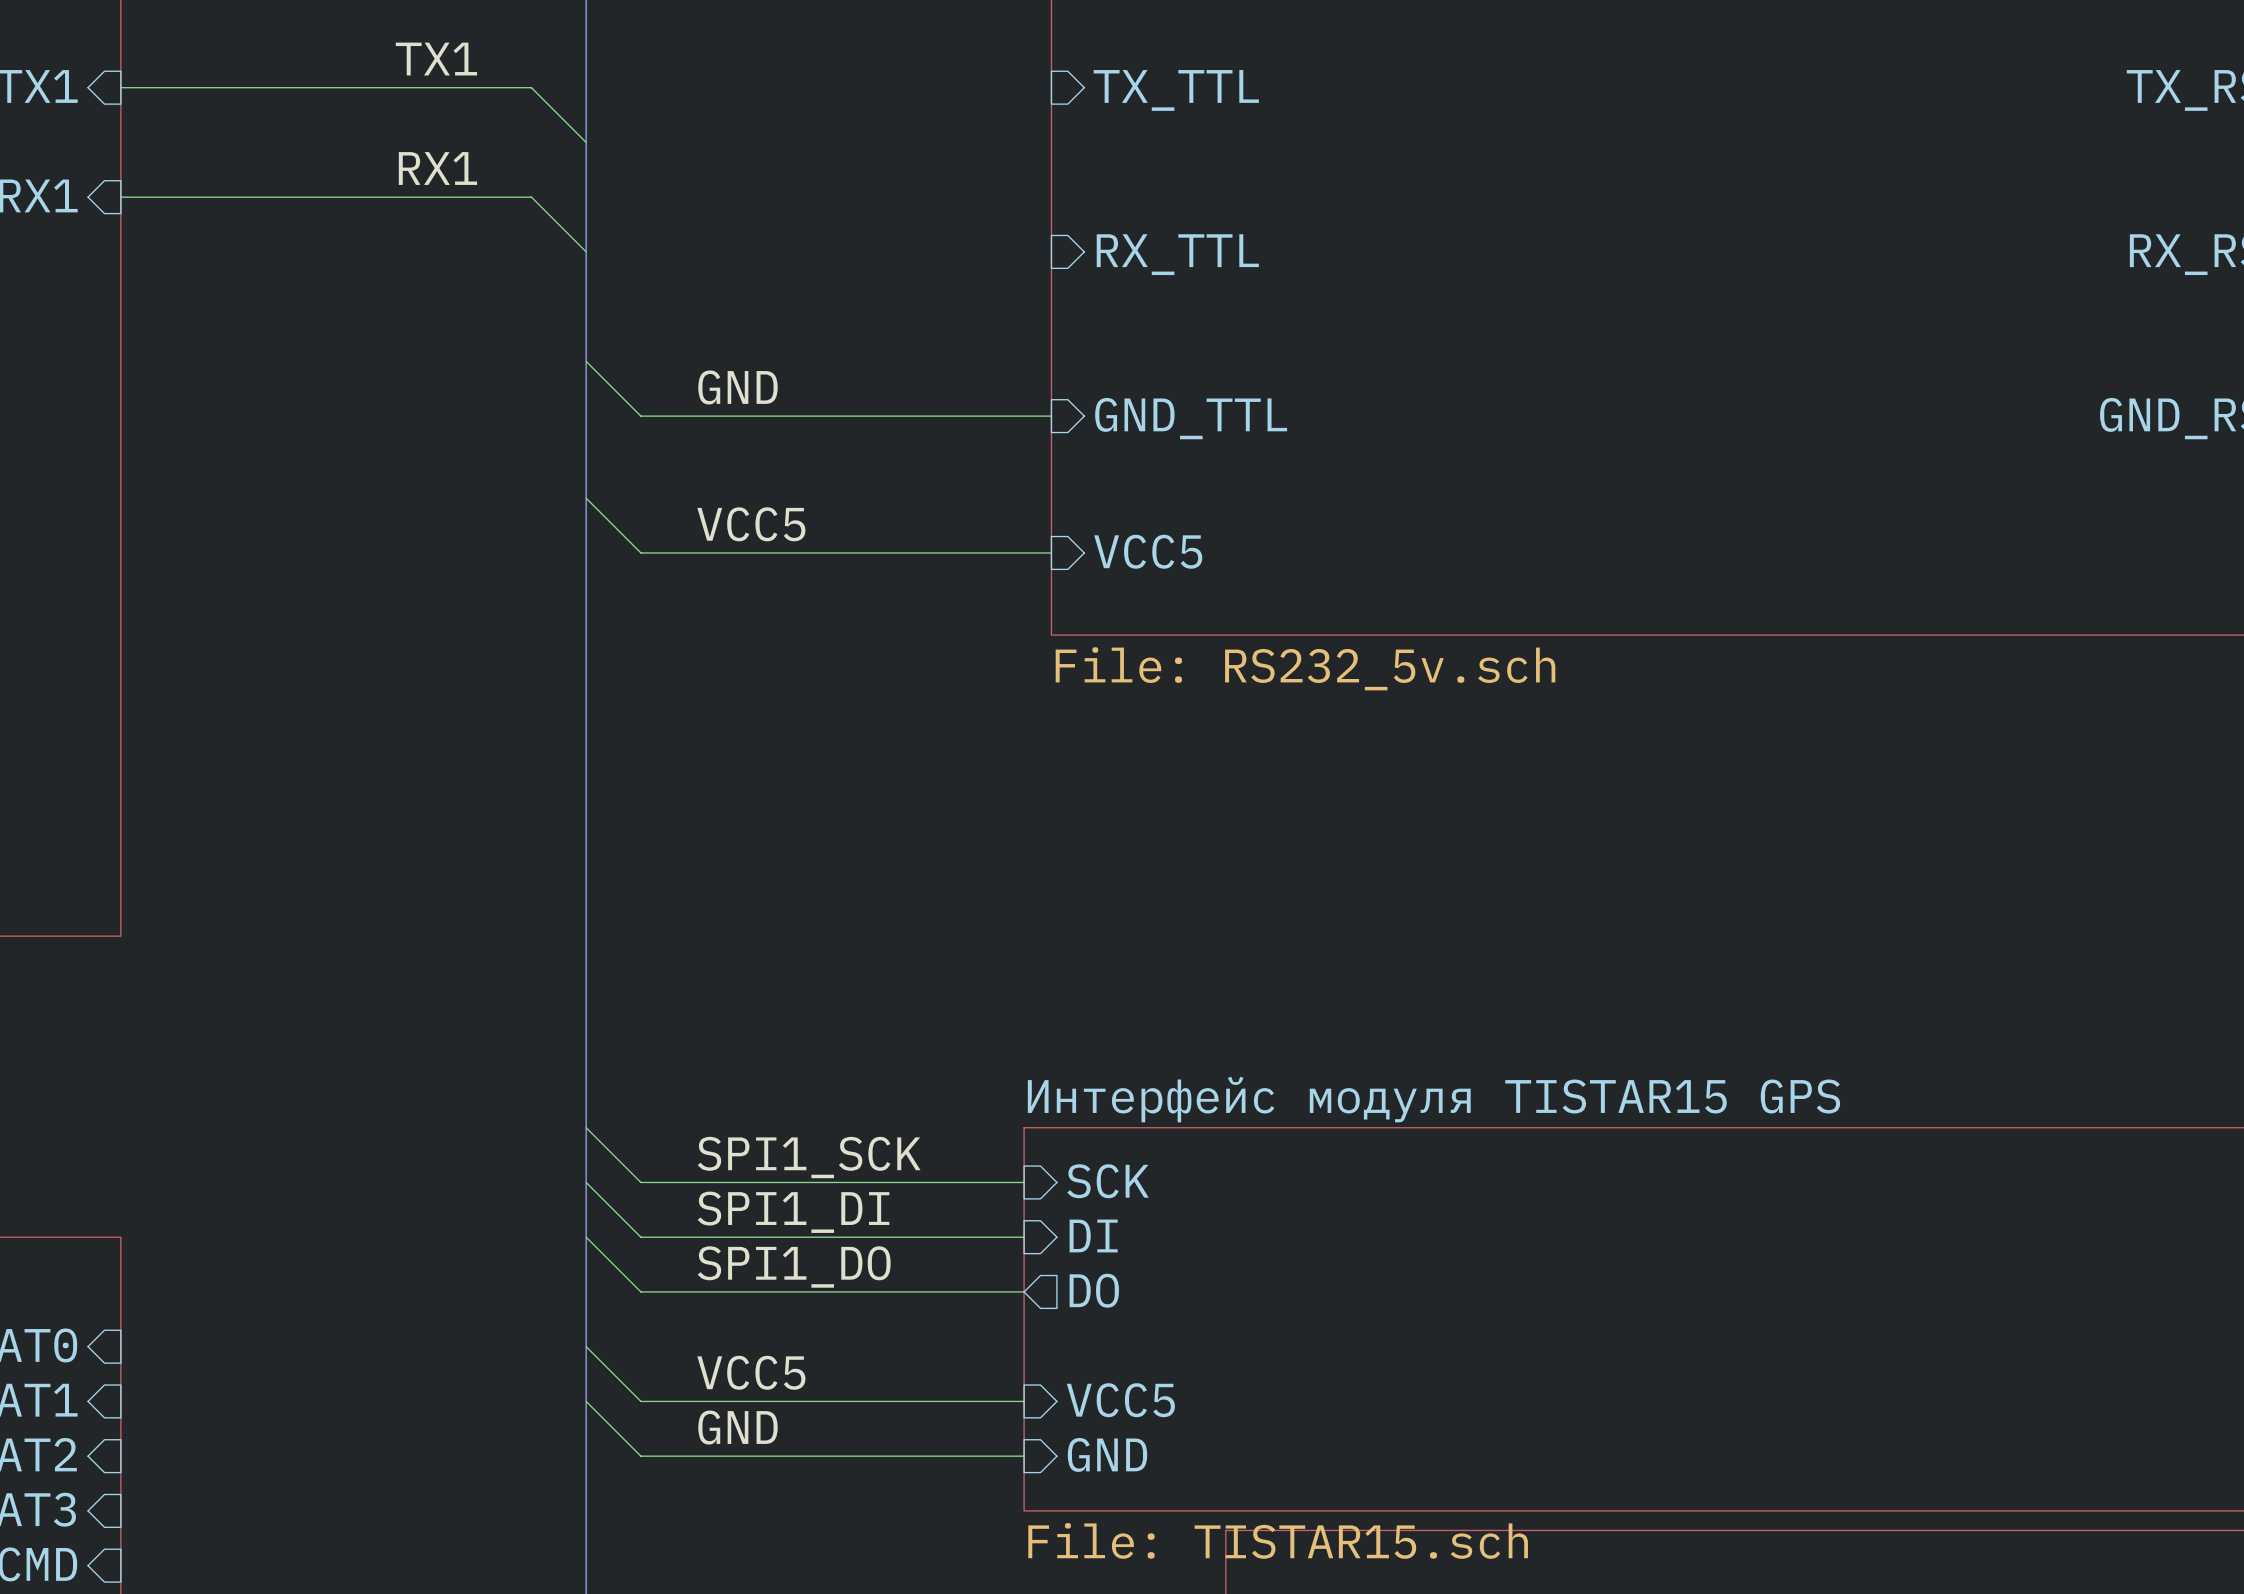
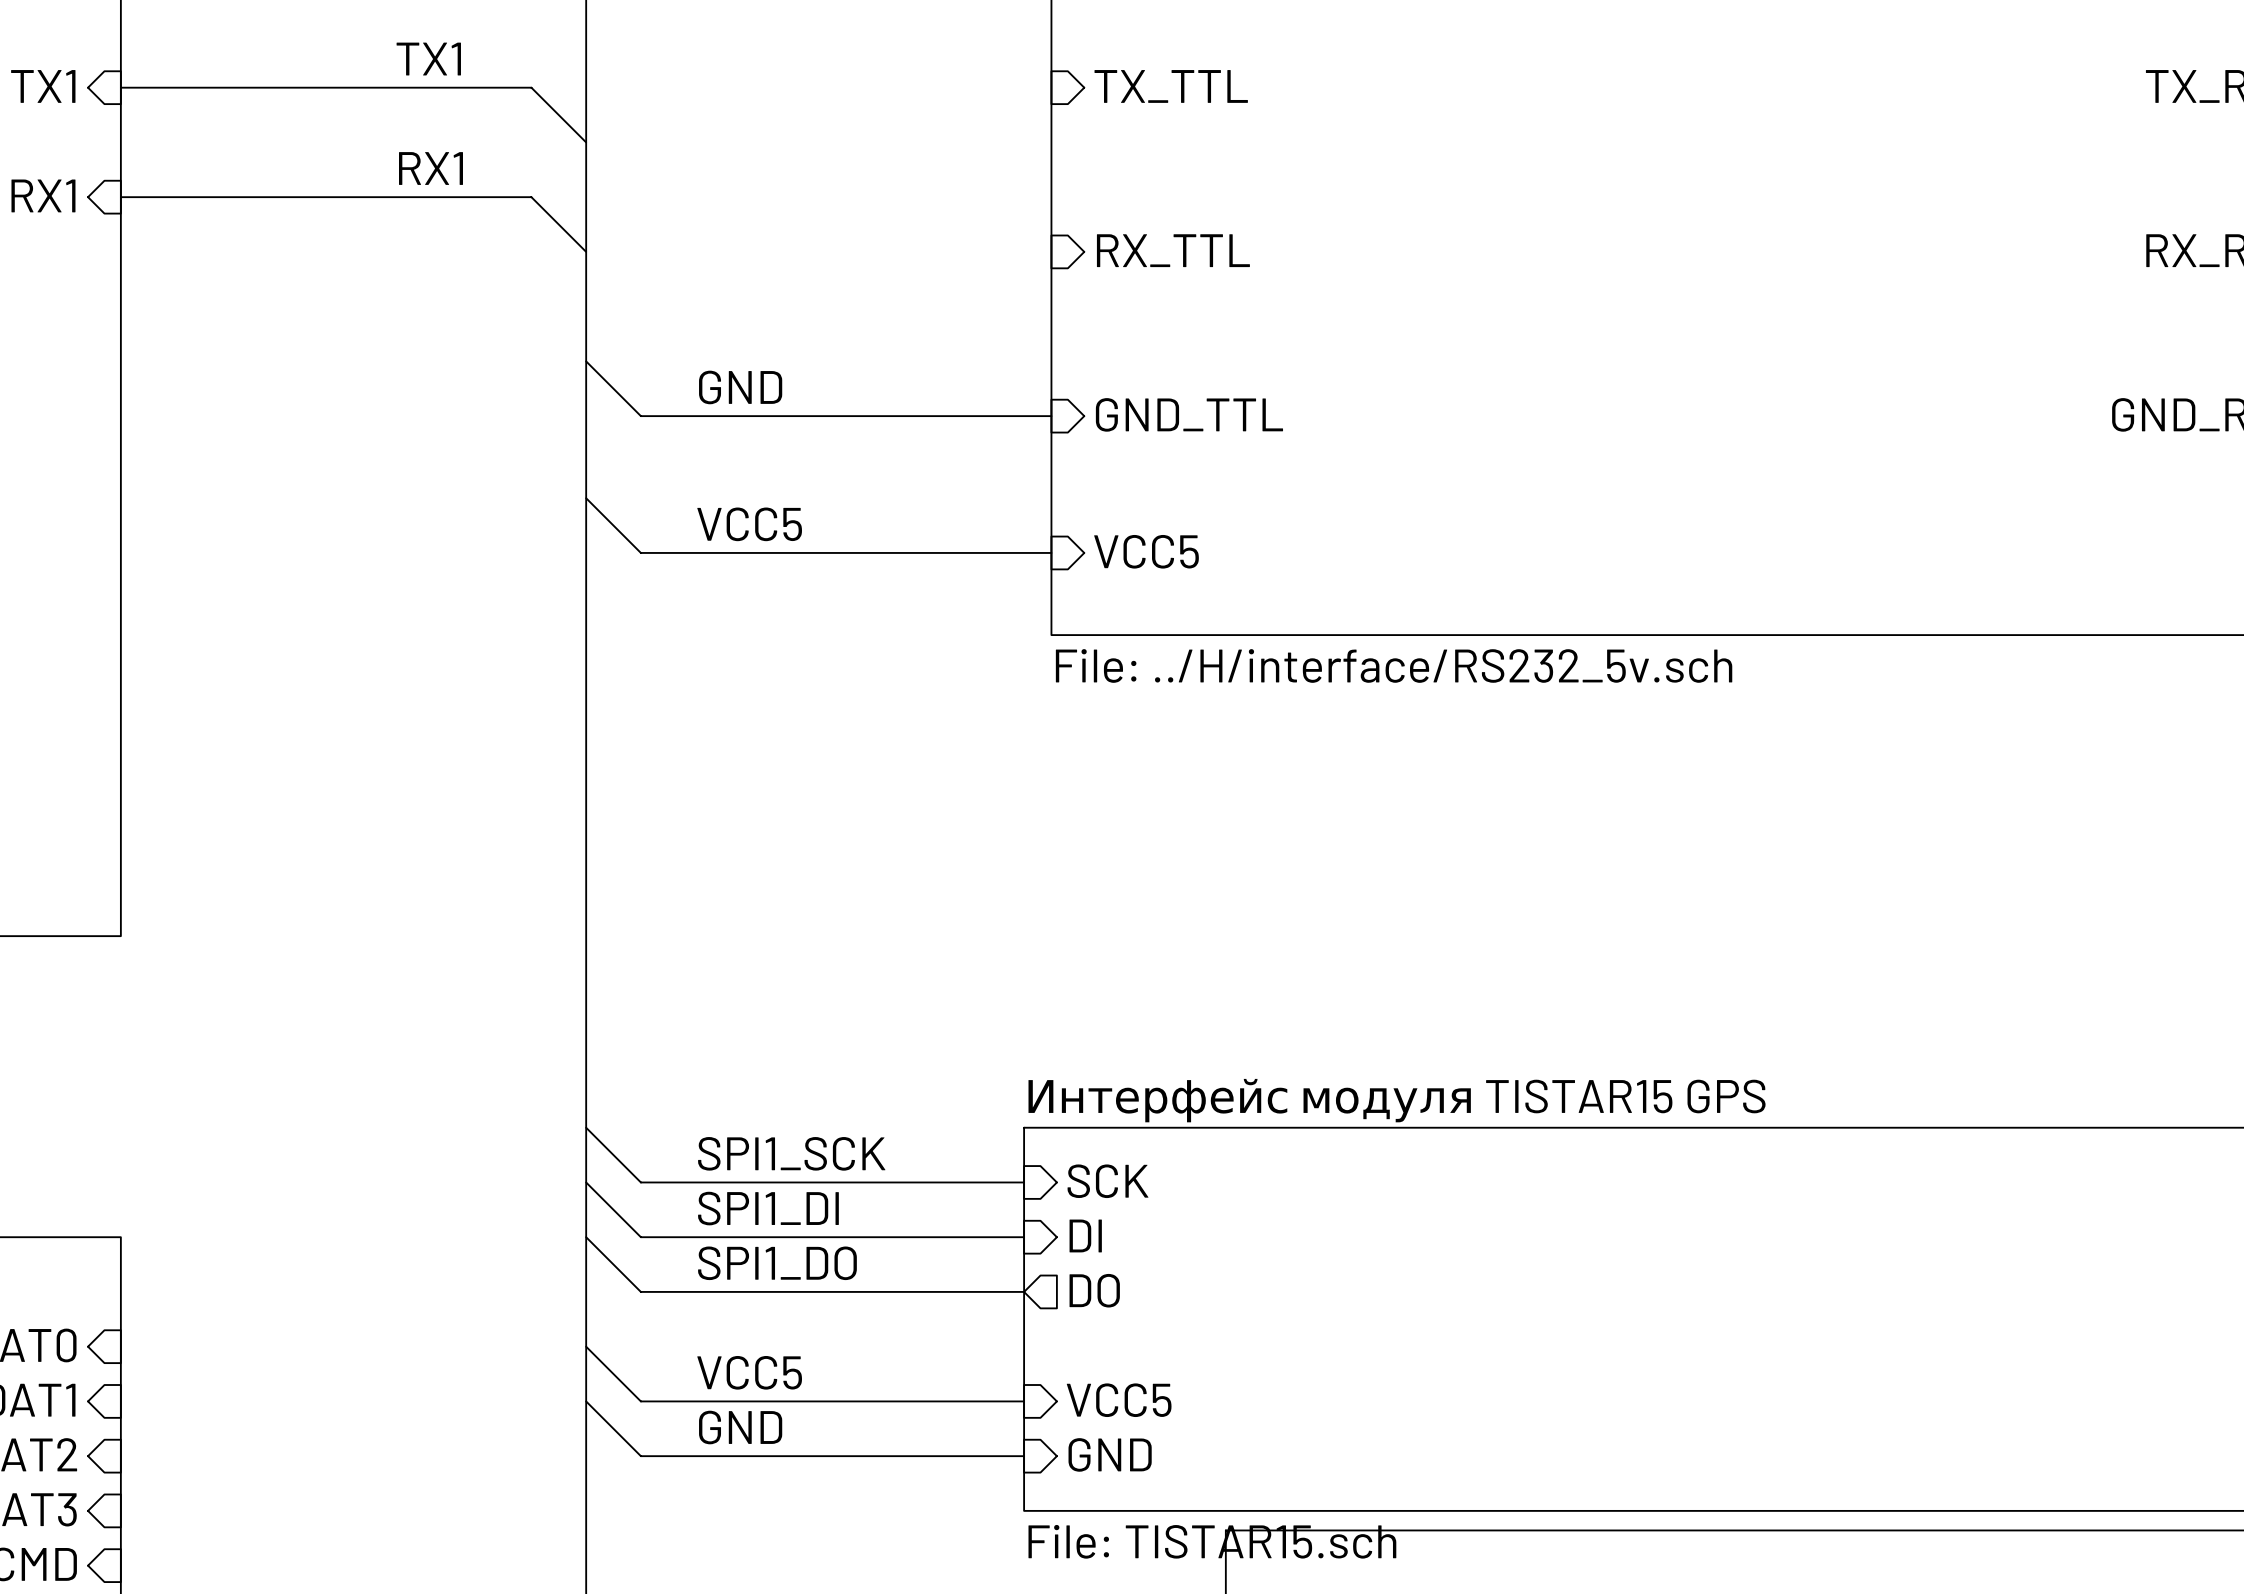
sheet value: File: RS232_5v.sch (1305, 668) -> File: ../H/interface/RS232_5v.sch (1394, 665)

